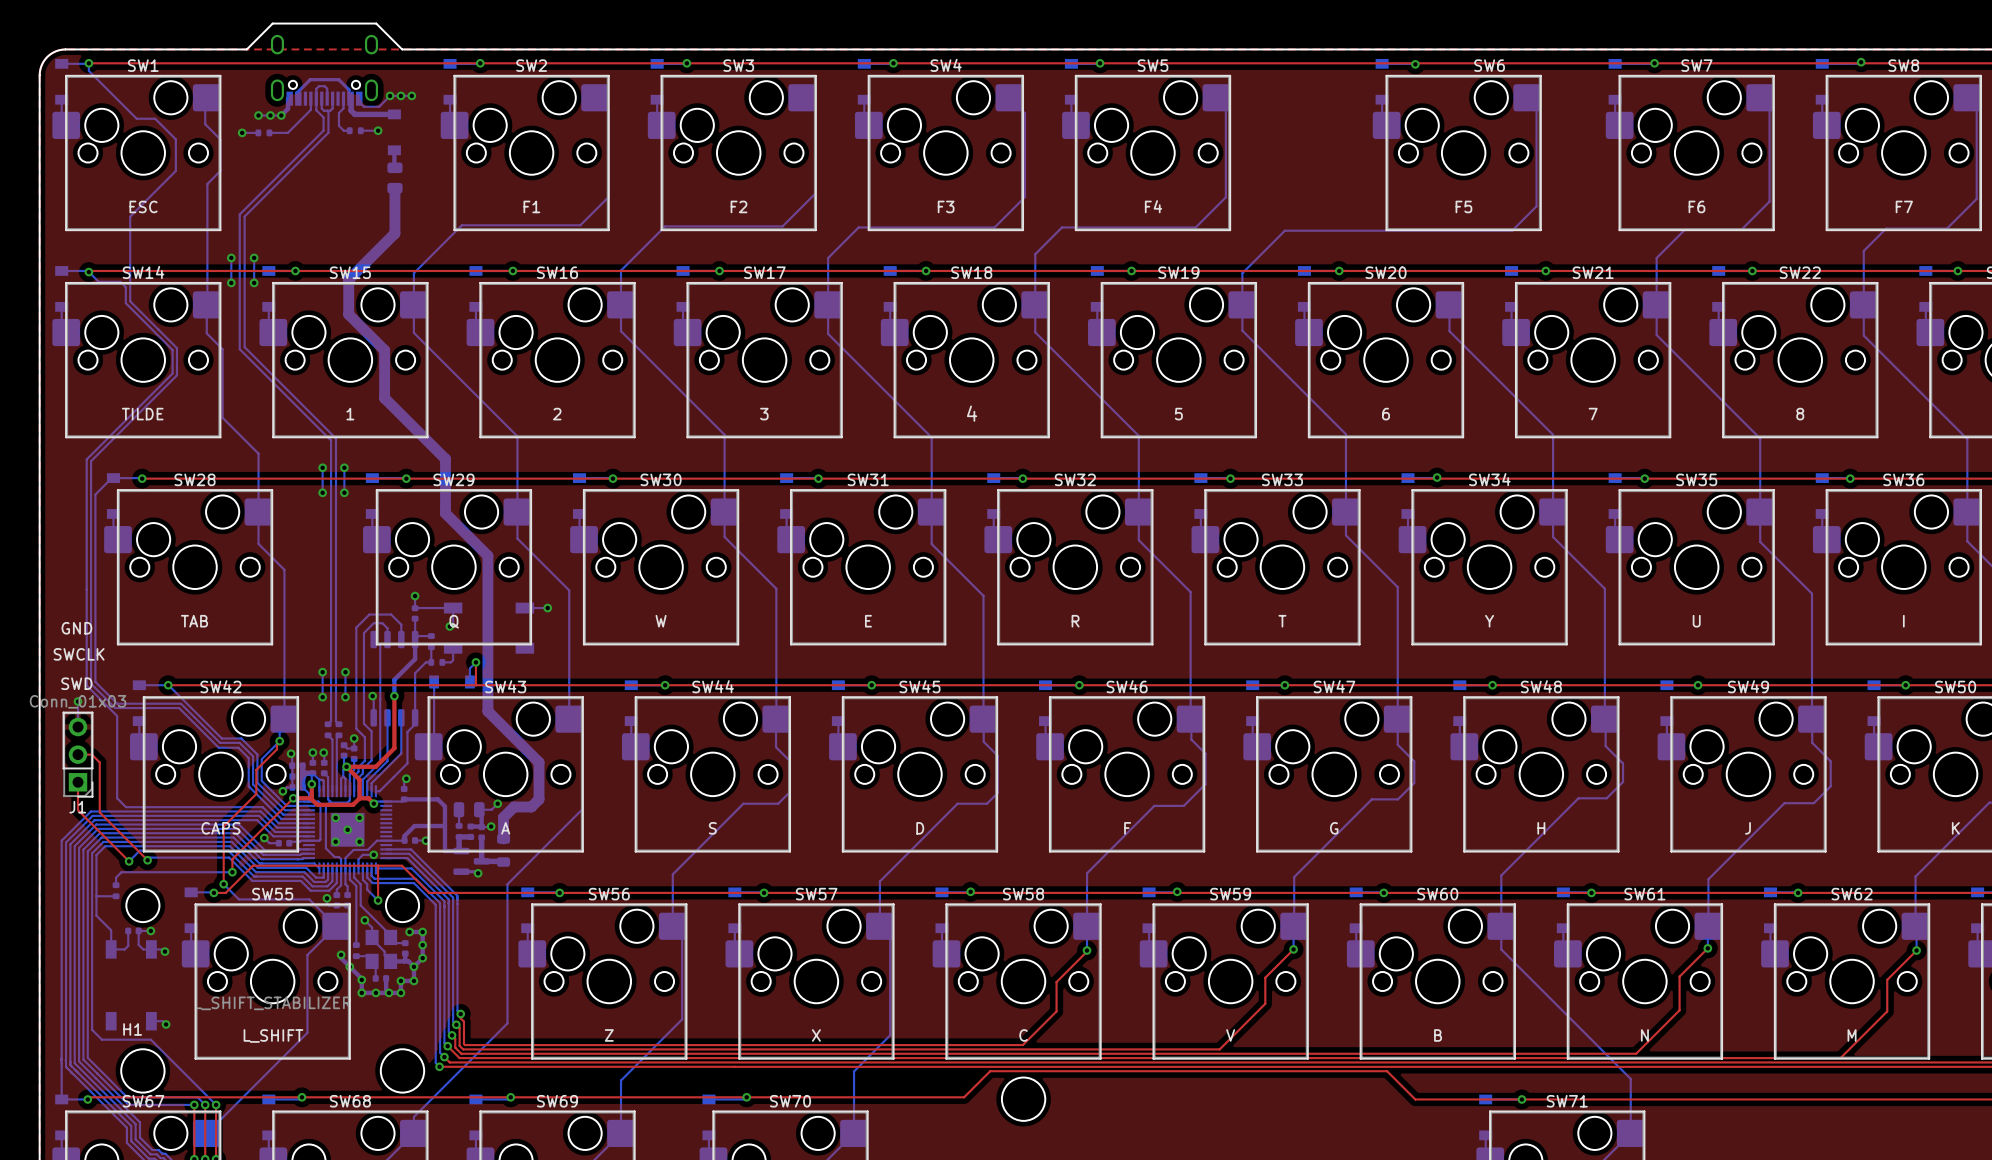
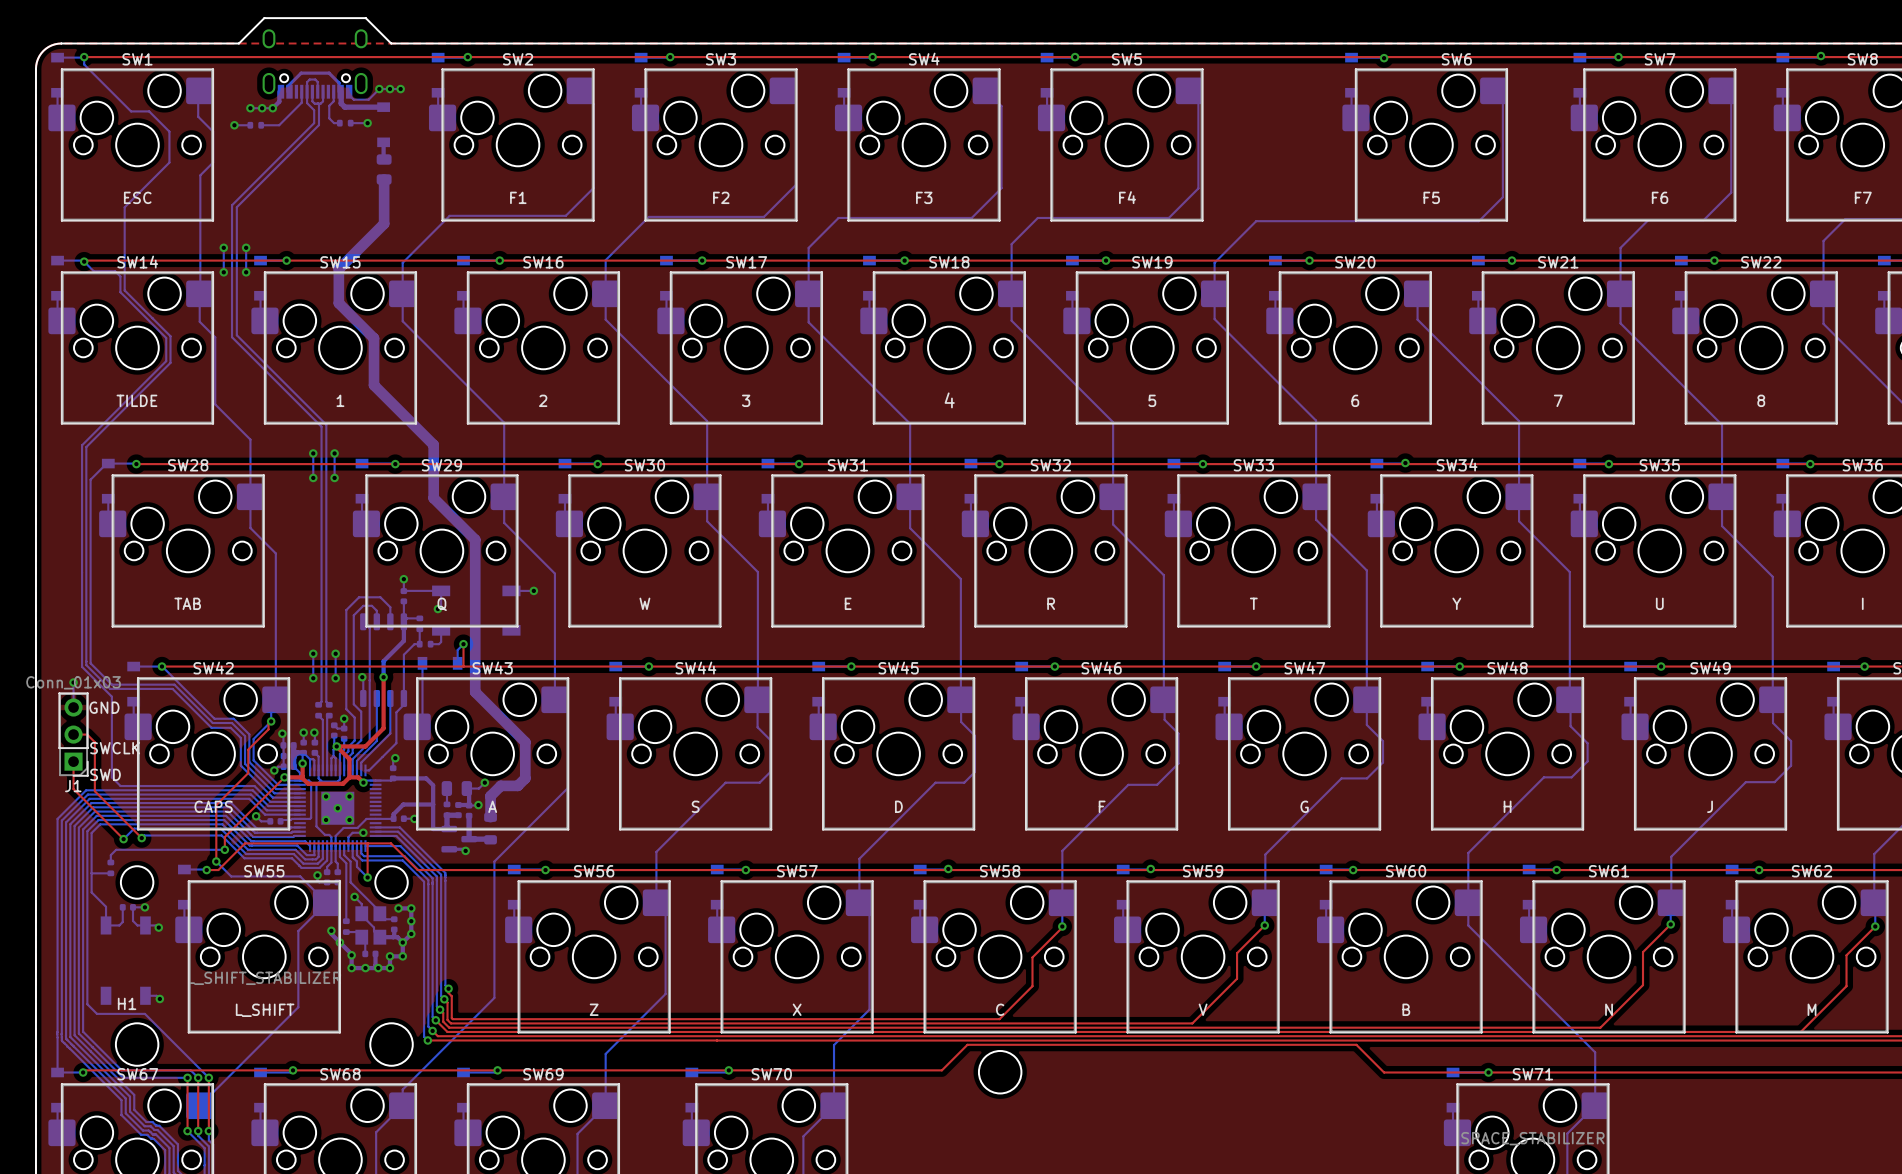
text position: GND (76, 628) -> GND (104, 707)
text position: SWCLK (79, 654) -> SWCLK (115, 748)
text position: SWD (76, 683) -> SWD (105, 774)

